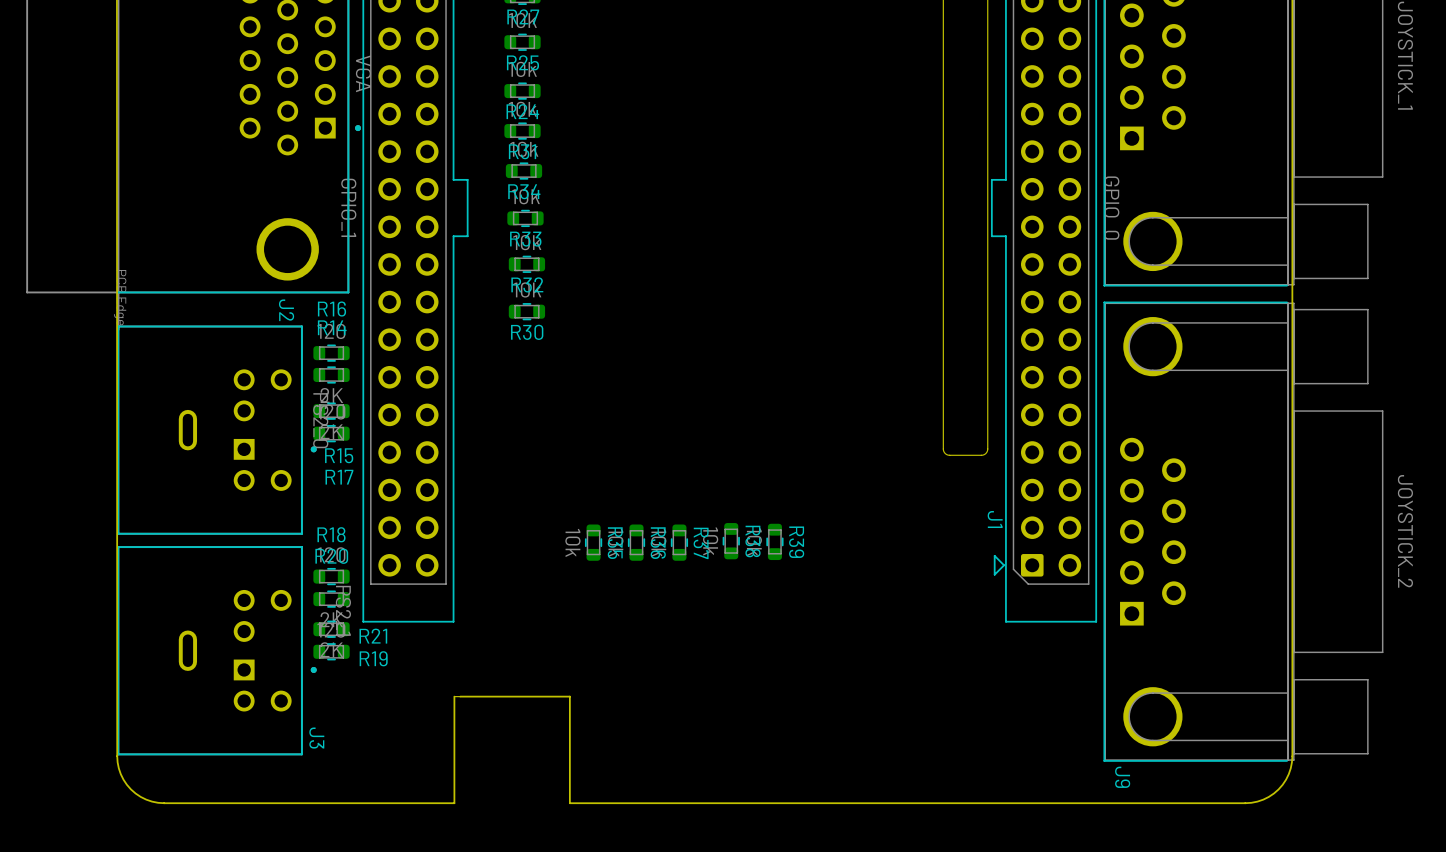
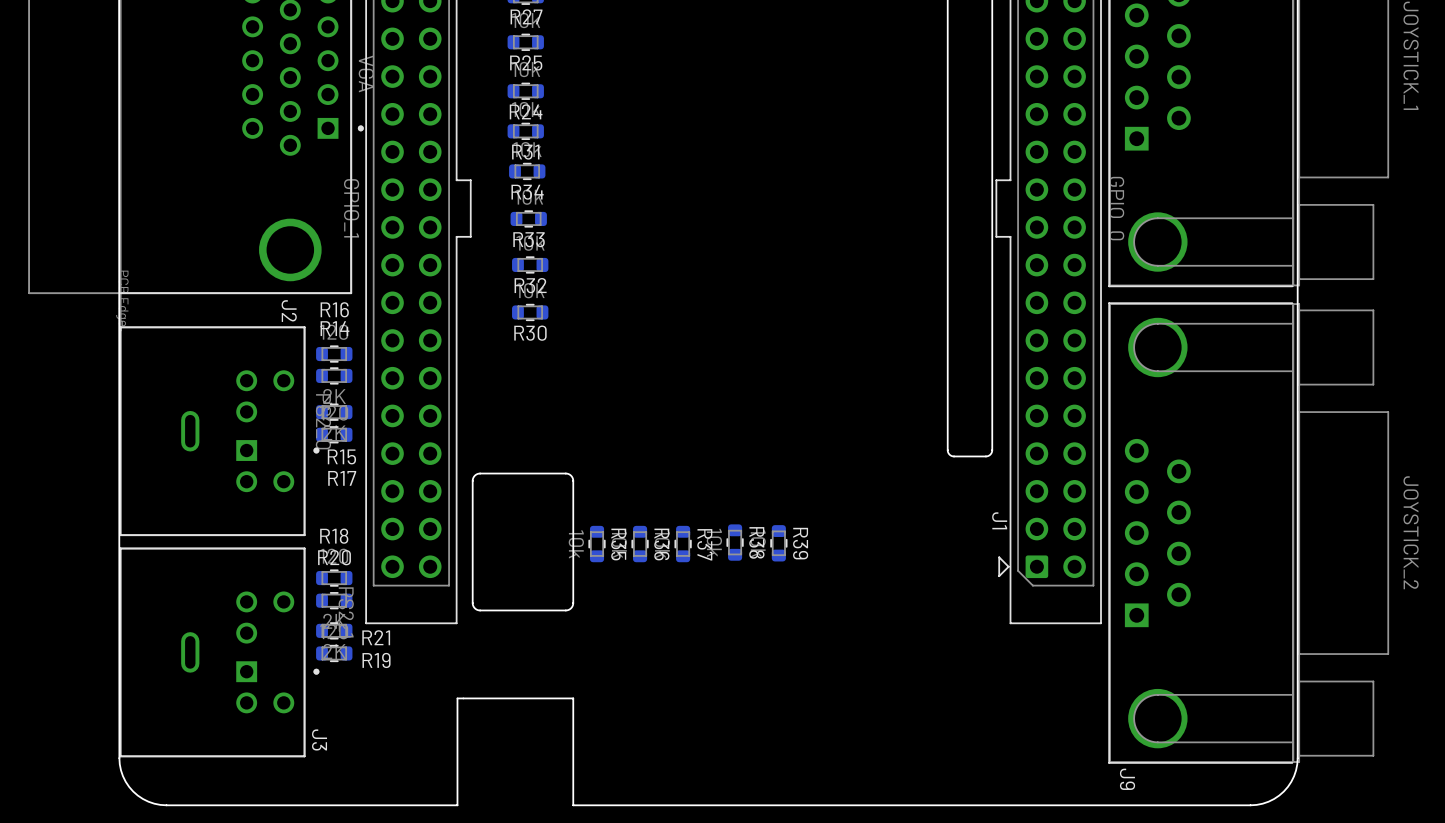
board edge: none -> (565, 473) (480, 473) (473, 477) (472, 603) (476, 609) (565, 610) (572, 606) (573, 480) (571, 475) (565, 473)

